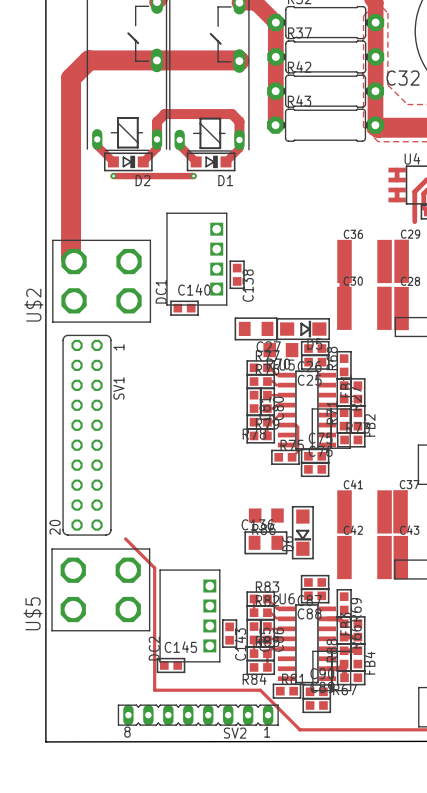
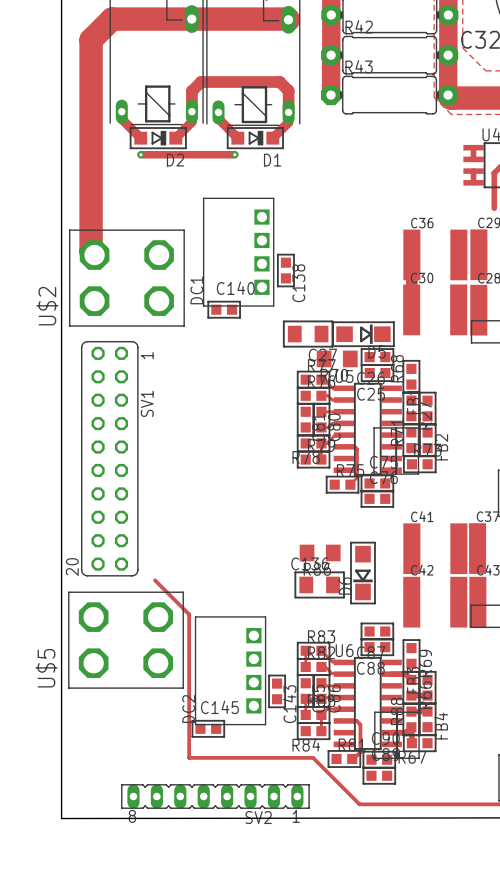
track: none -> (343, 720) (356, 720) (360, 724) (360, 752) (353, 759)
SV2 position: (198, 715) -> (215, 796)

